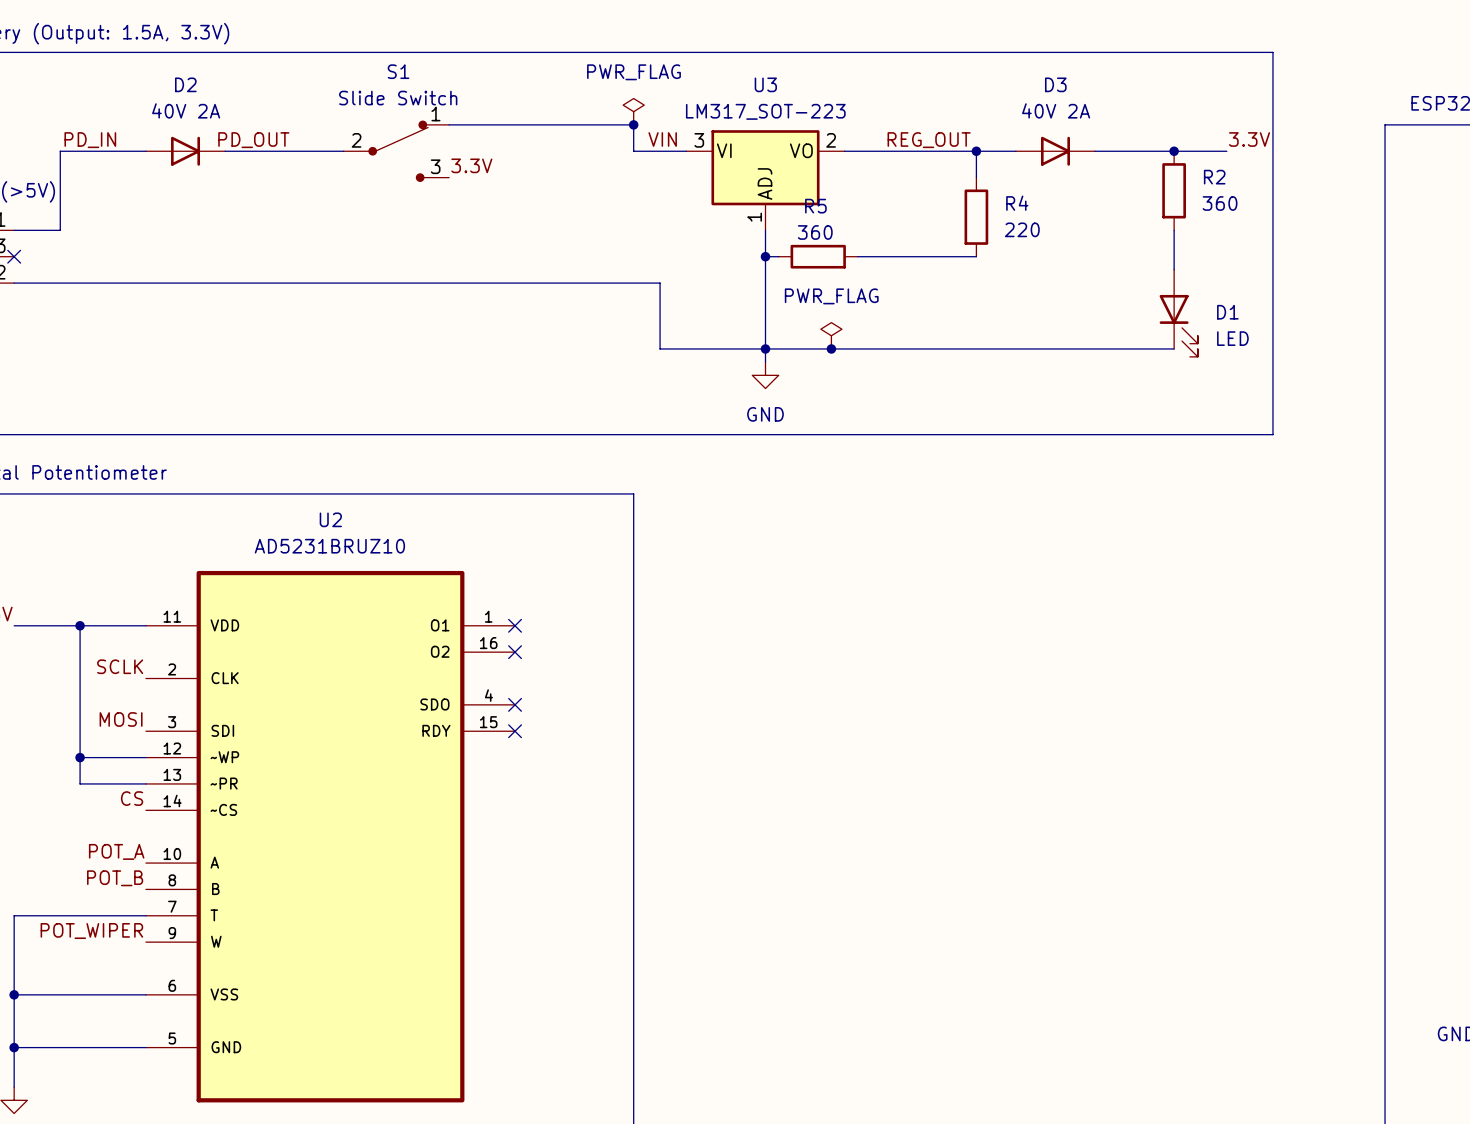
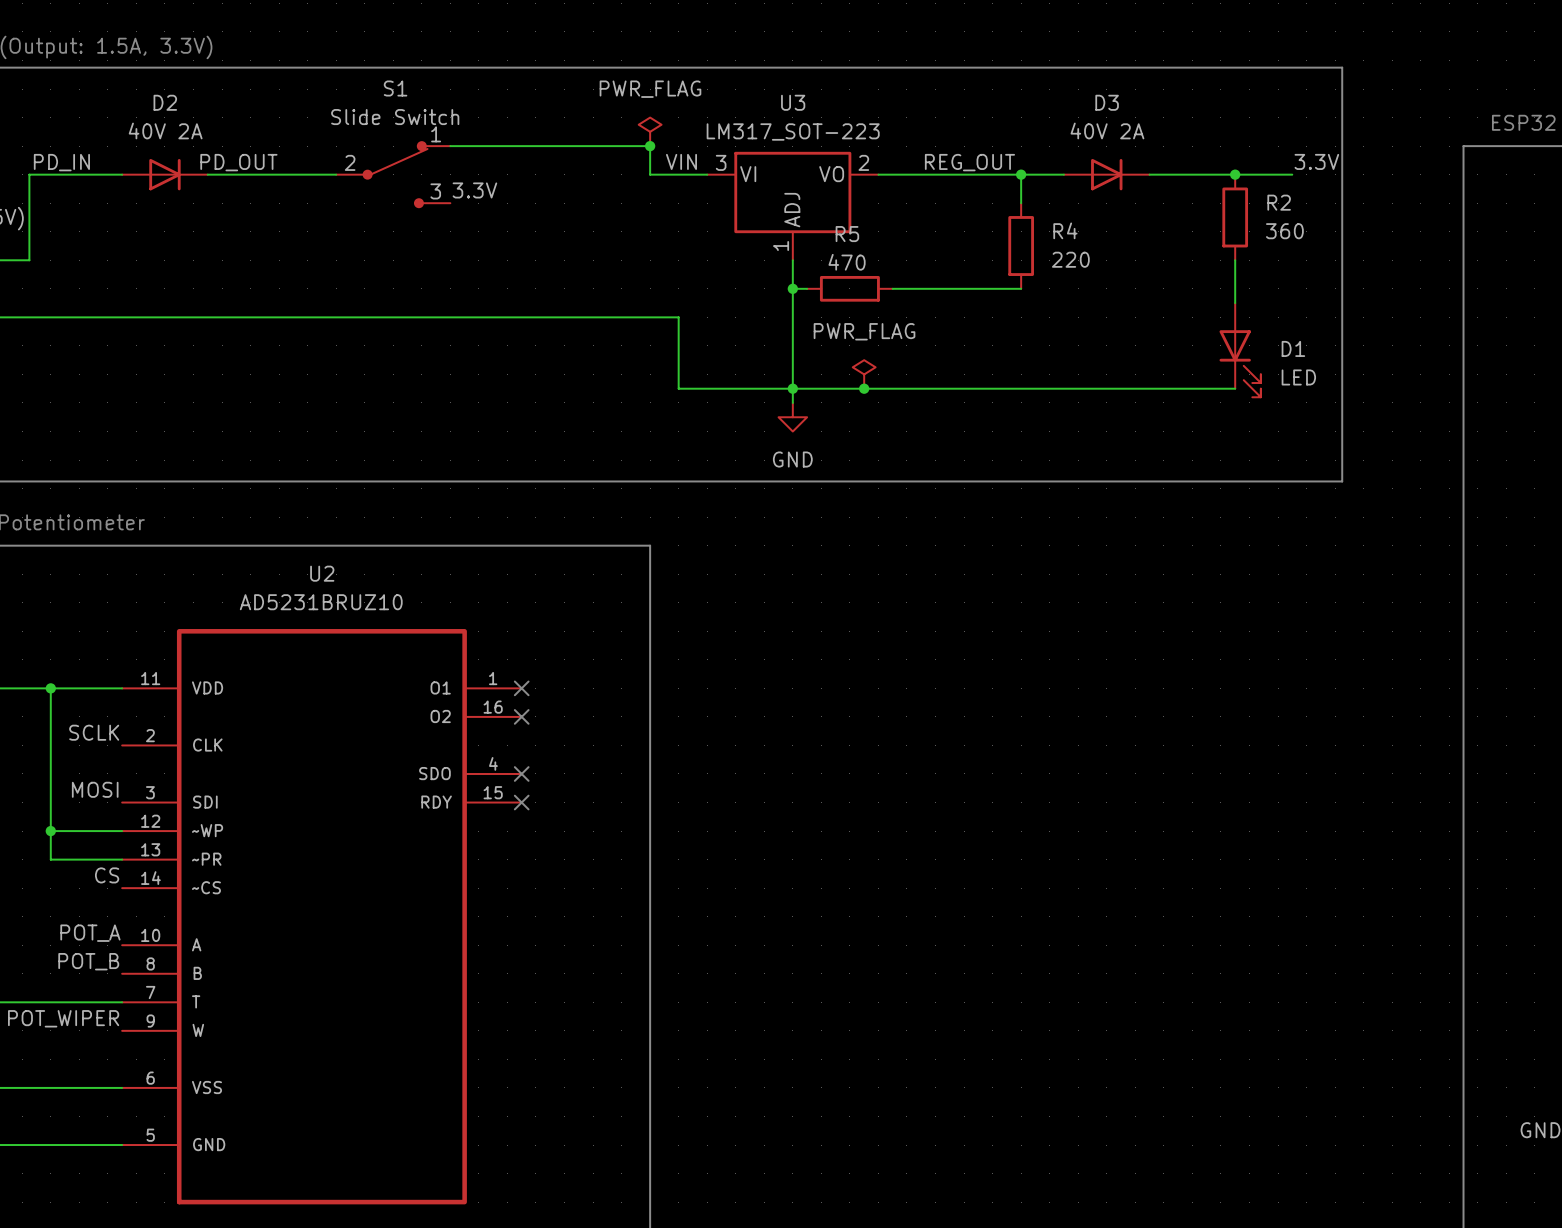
R5 value: 360 (815, 232) -> 470 (847, 262)

